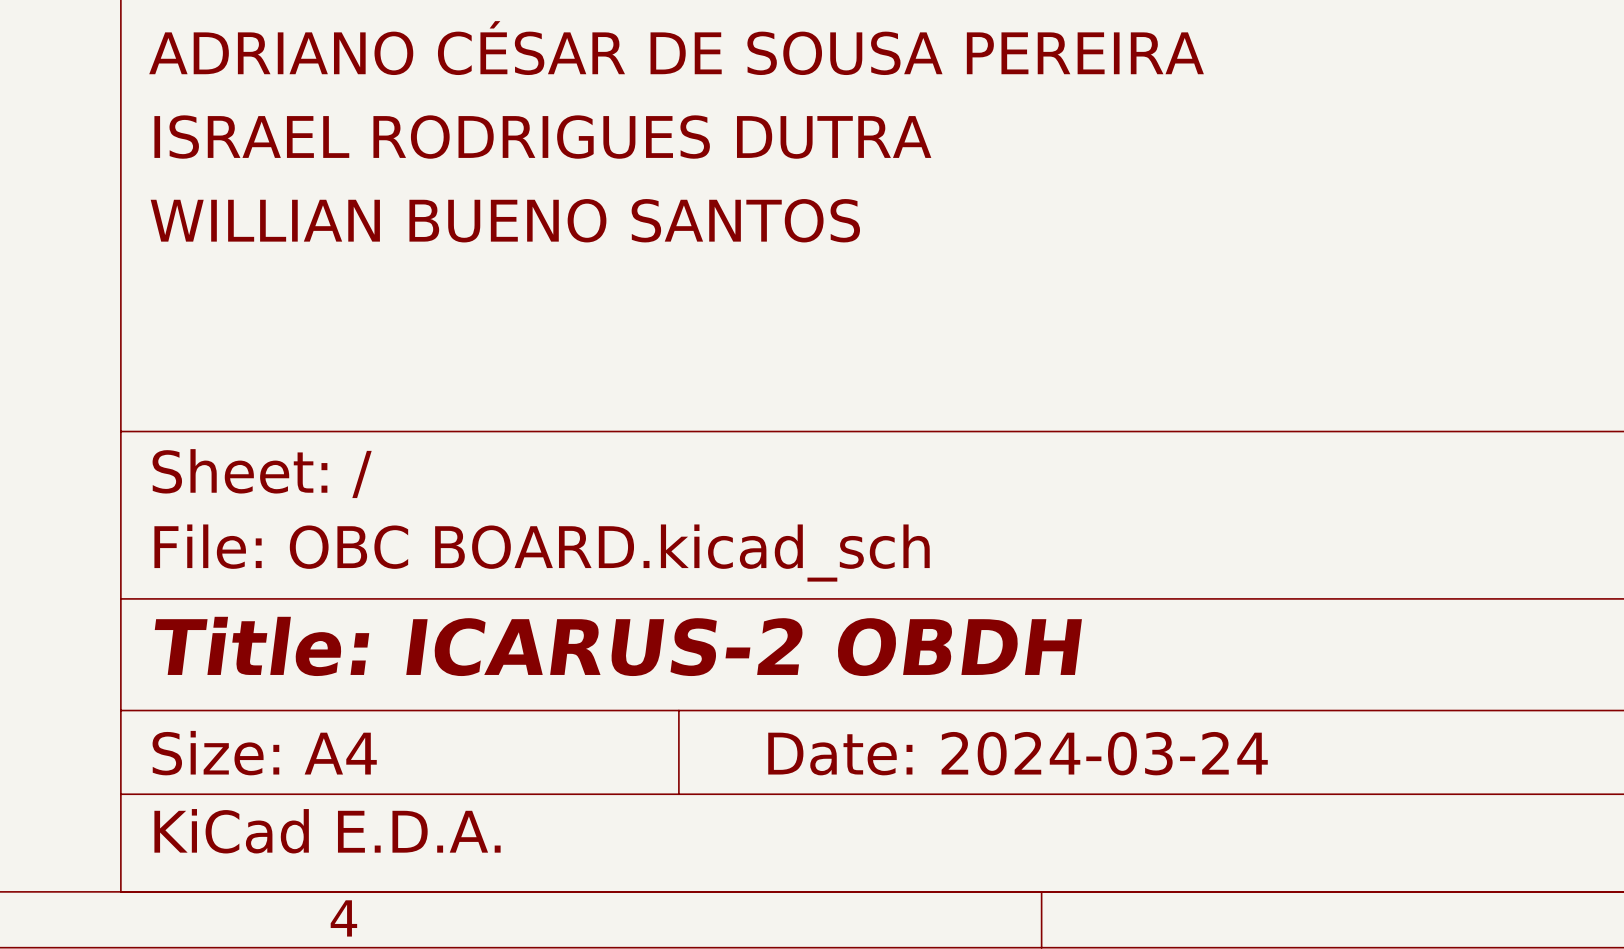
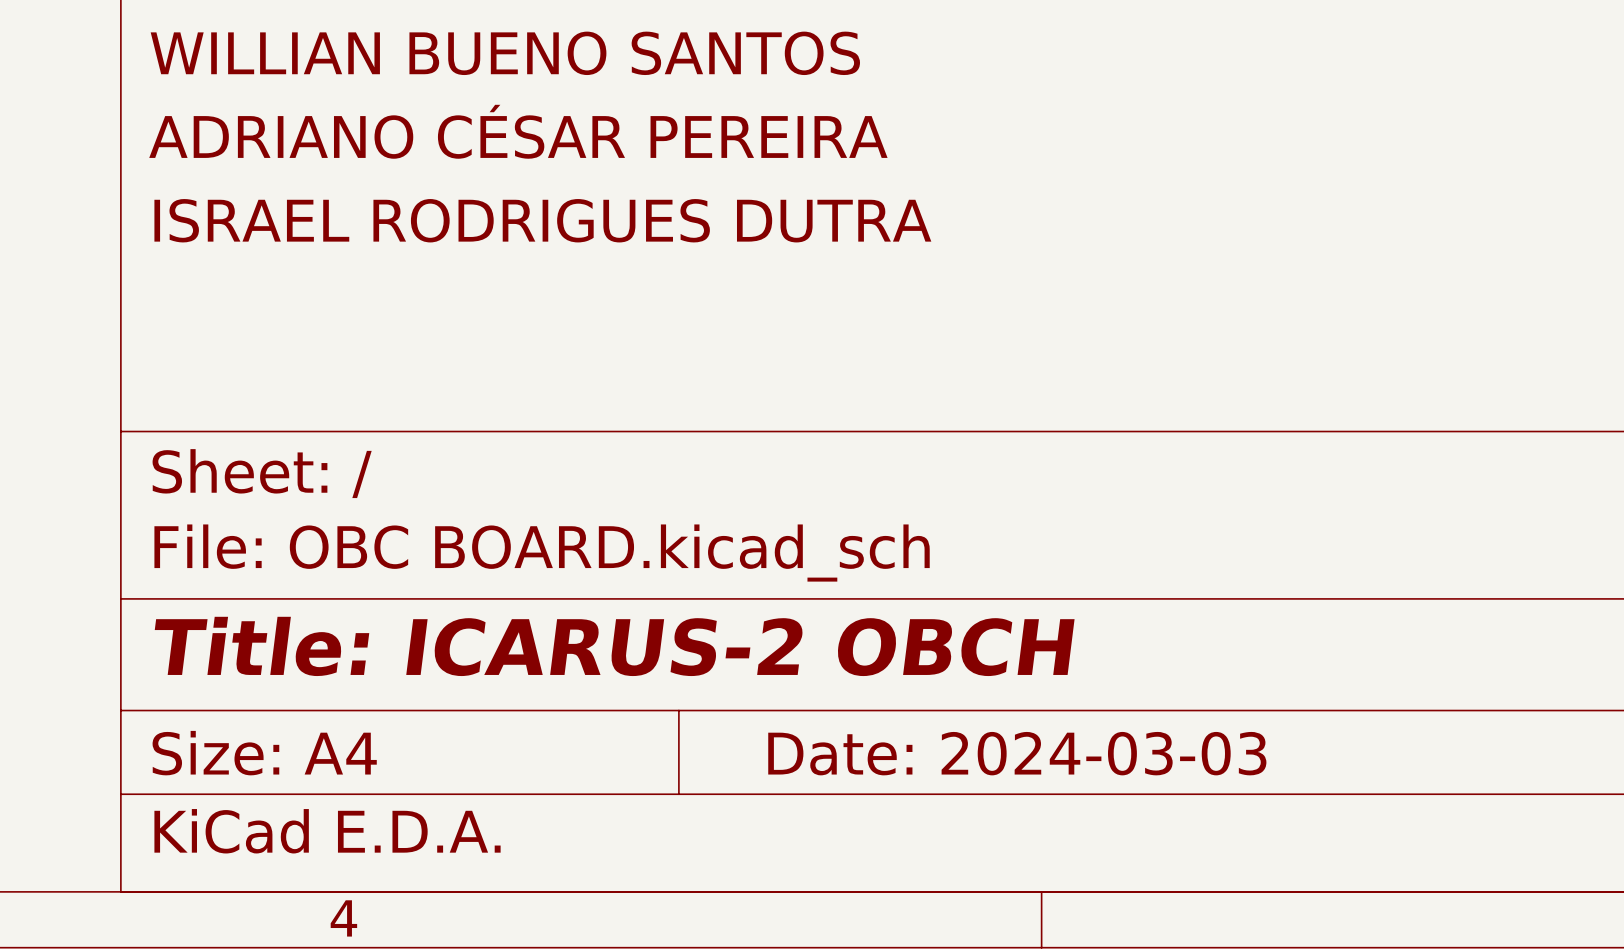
title block: ADRIANO CÉSAR DE SOUSA PEREIRA (676, 48) -> WILLIAN BUENO SANTOS (505, 53)
title block: ISRAEL RODRIGUES DUTRA (542, 137) -> ADRIANO CÉSAR PEREIRA (518, 131)
title block: WILLIAN BUENO SANTOS (505, 220) -> ISRAEL RODRIGUES DUTRA (542, 220)
title block: Title: ICARUS-2 OBDH (618, 646) -> Title: ICARUS-2 OBCH (614, 646)
title block: Date: 2024-03-24 (1018, 753) -> Date: 2024-03-03 (1017, 753)

